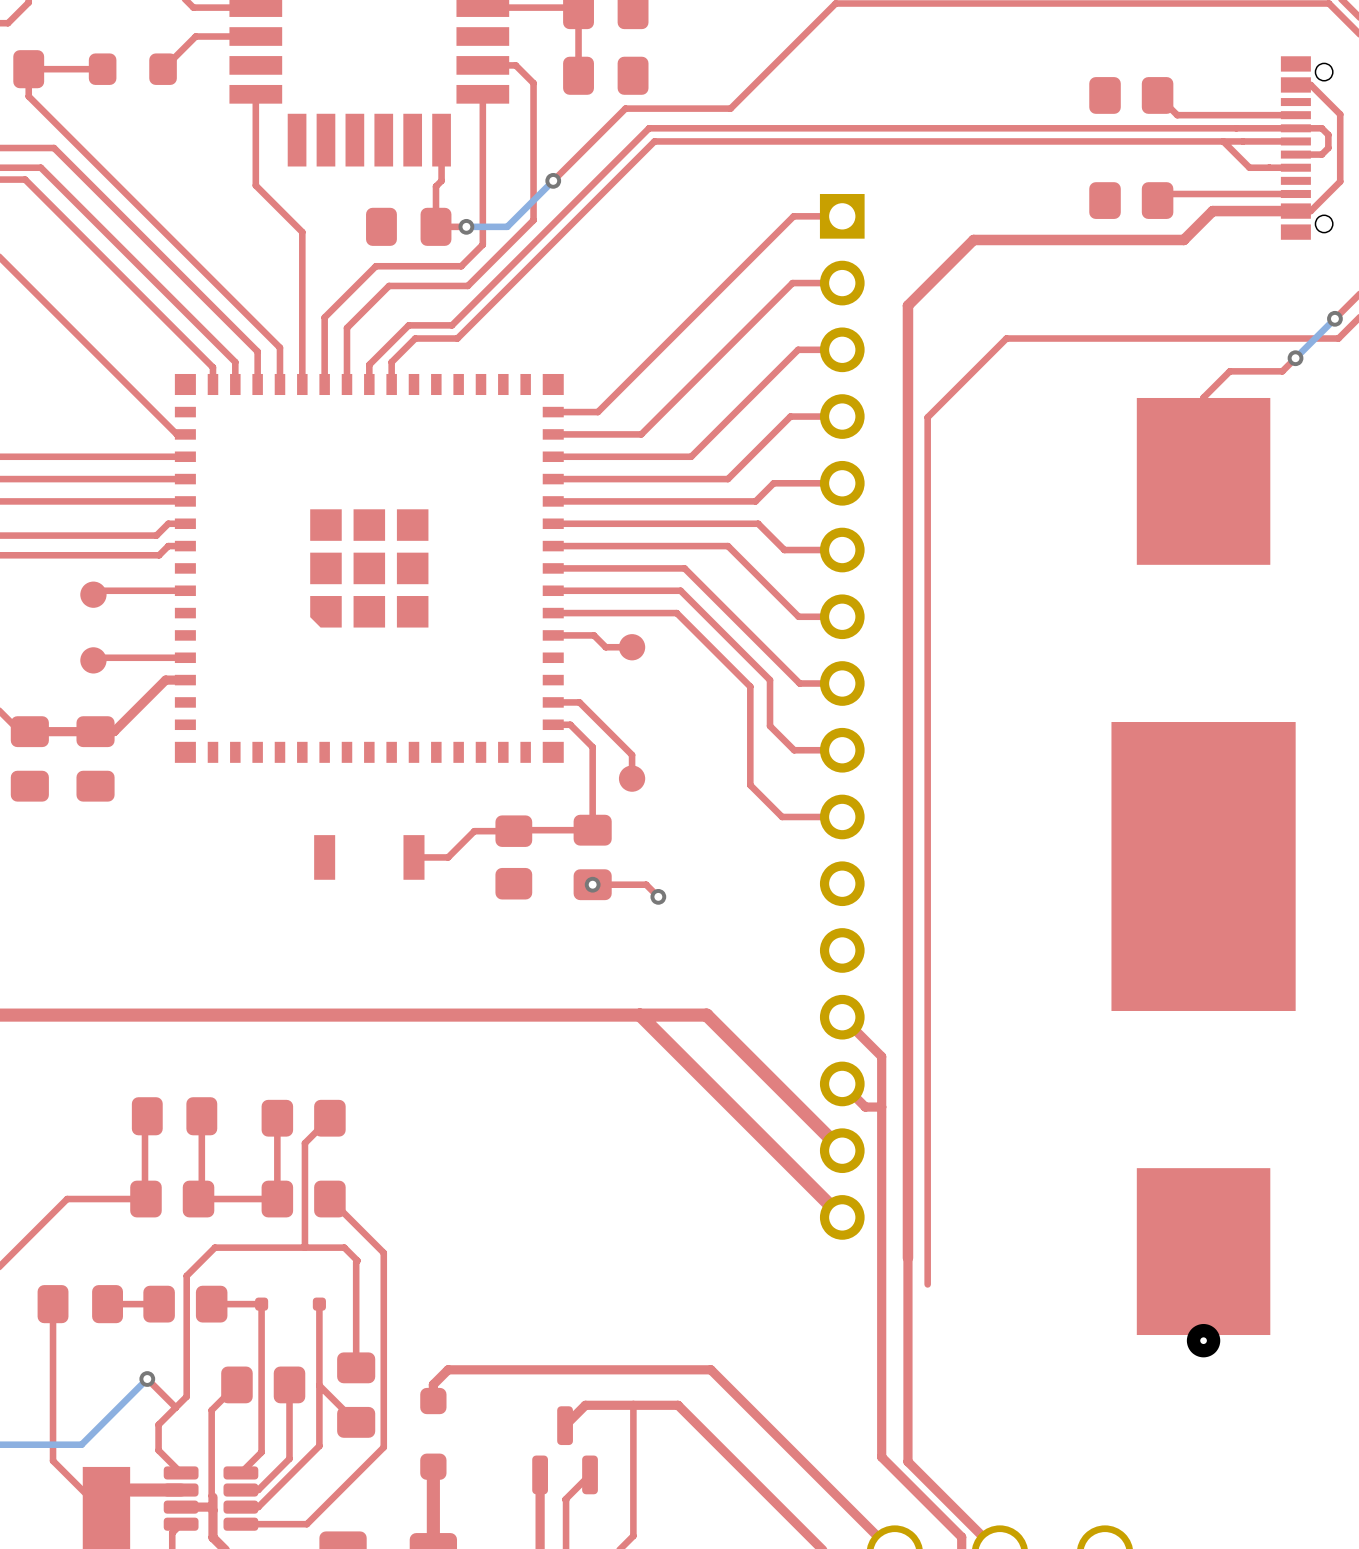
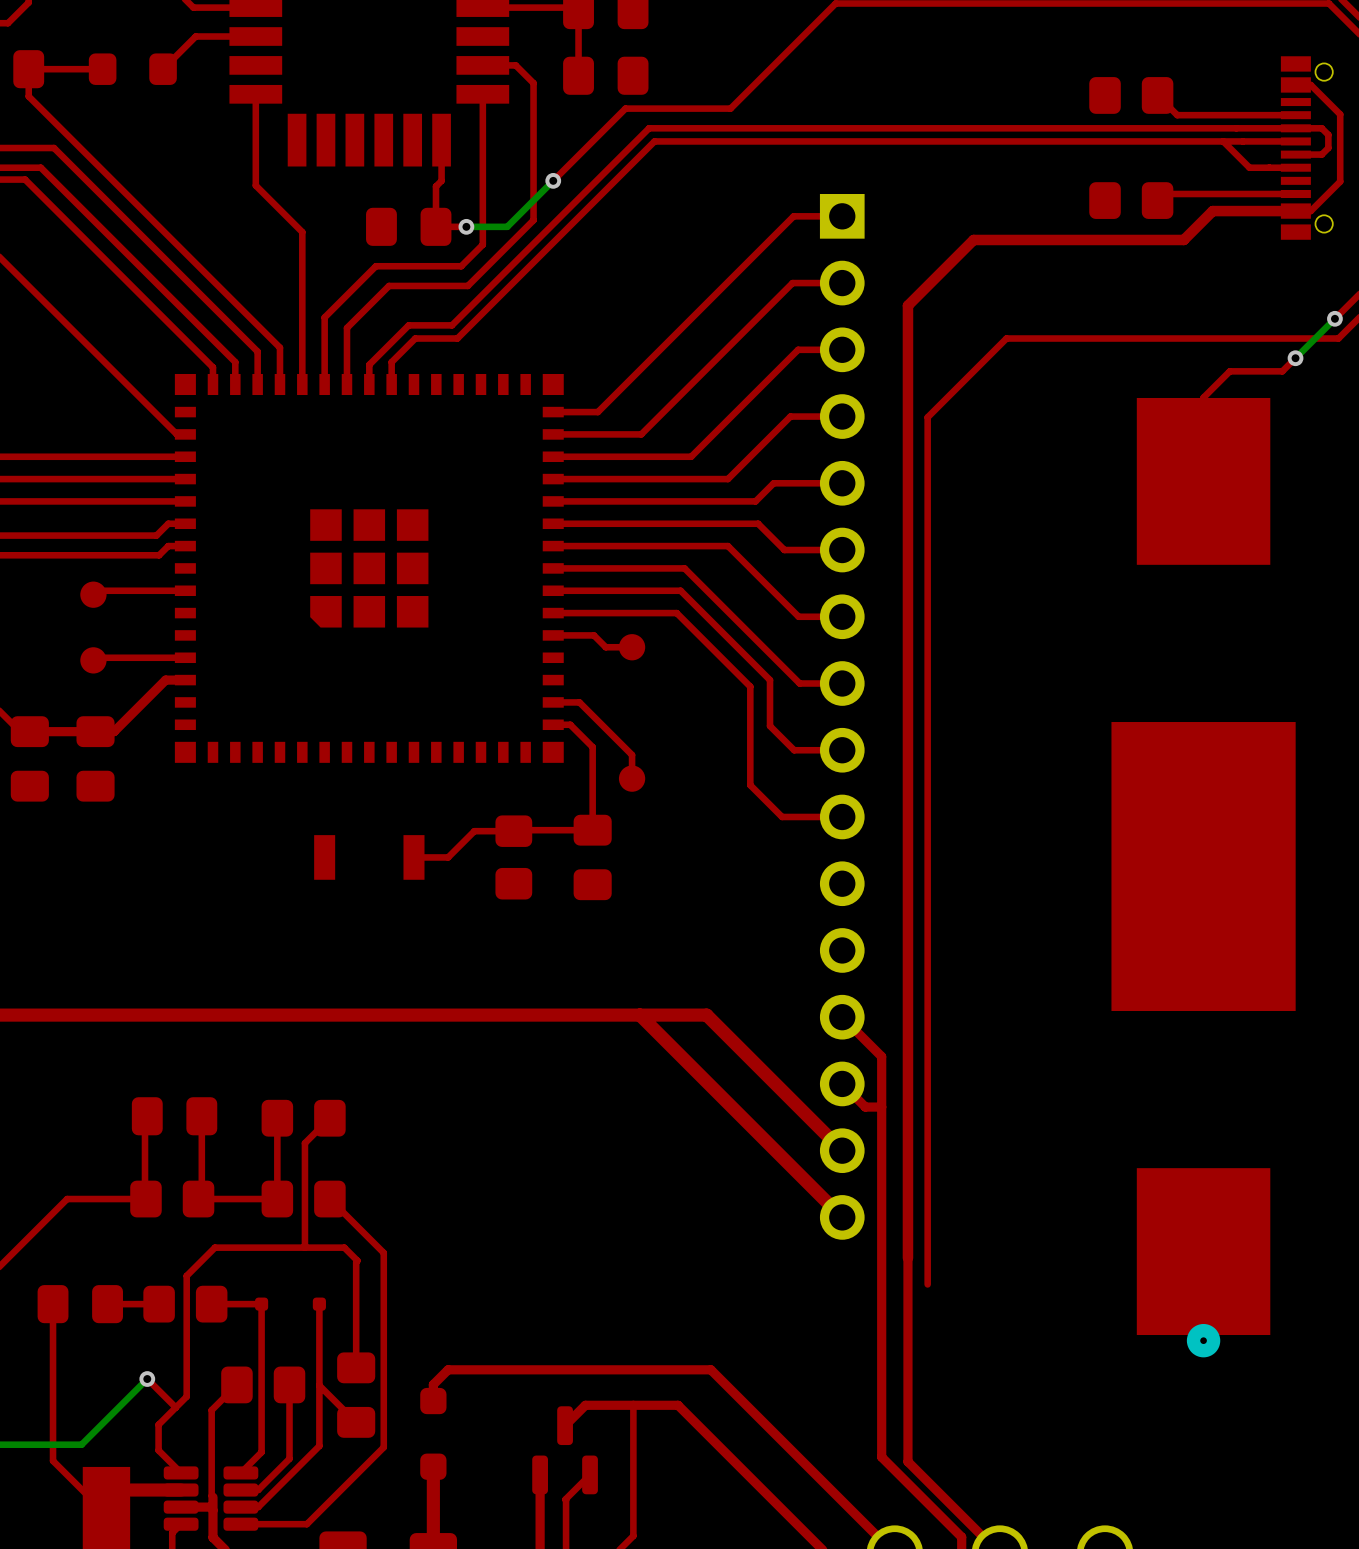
top track: (592, 884) (646, 884) (658, 896) -> none
via: (592, 884) -> none
via: (658, 896) -> none

